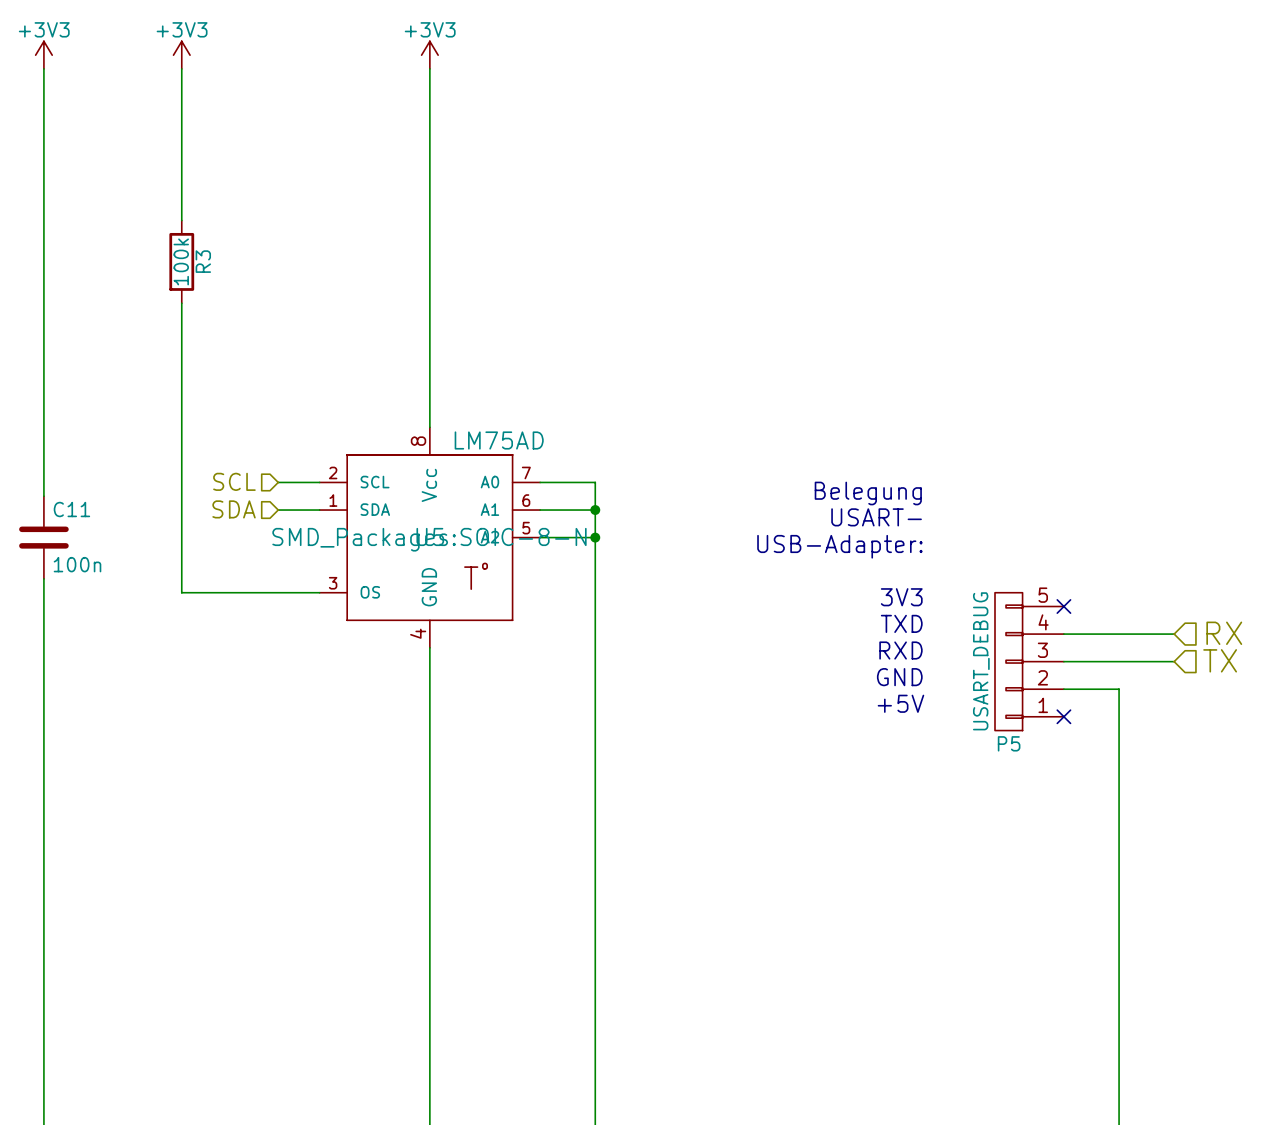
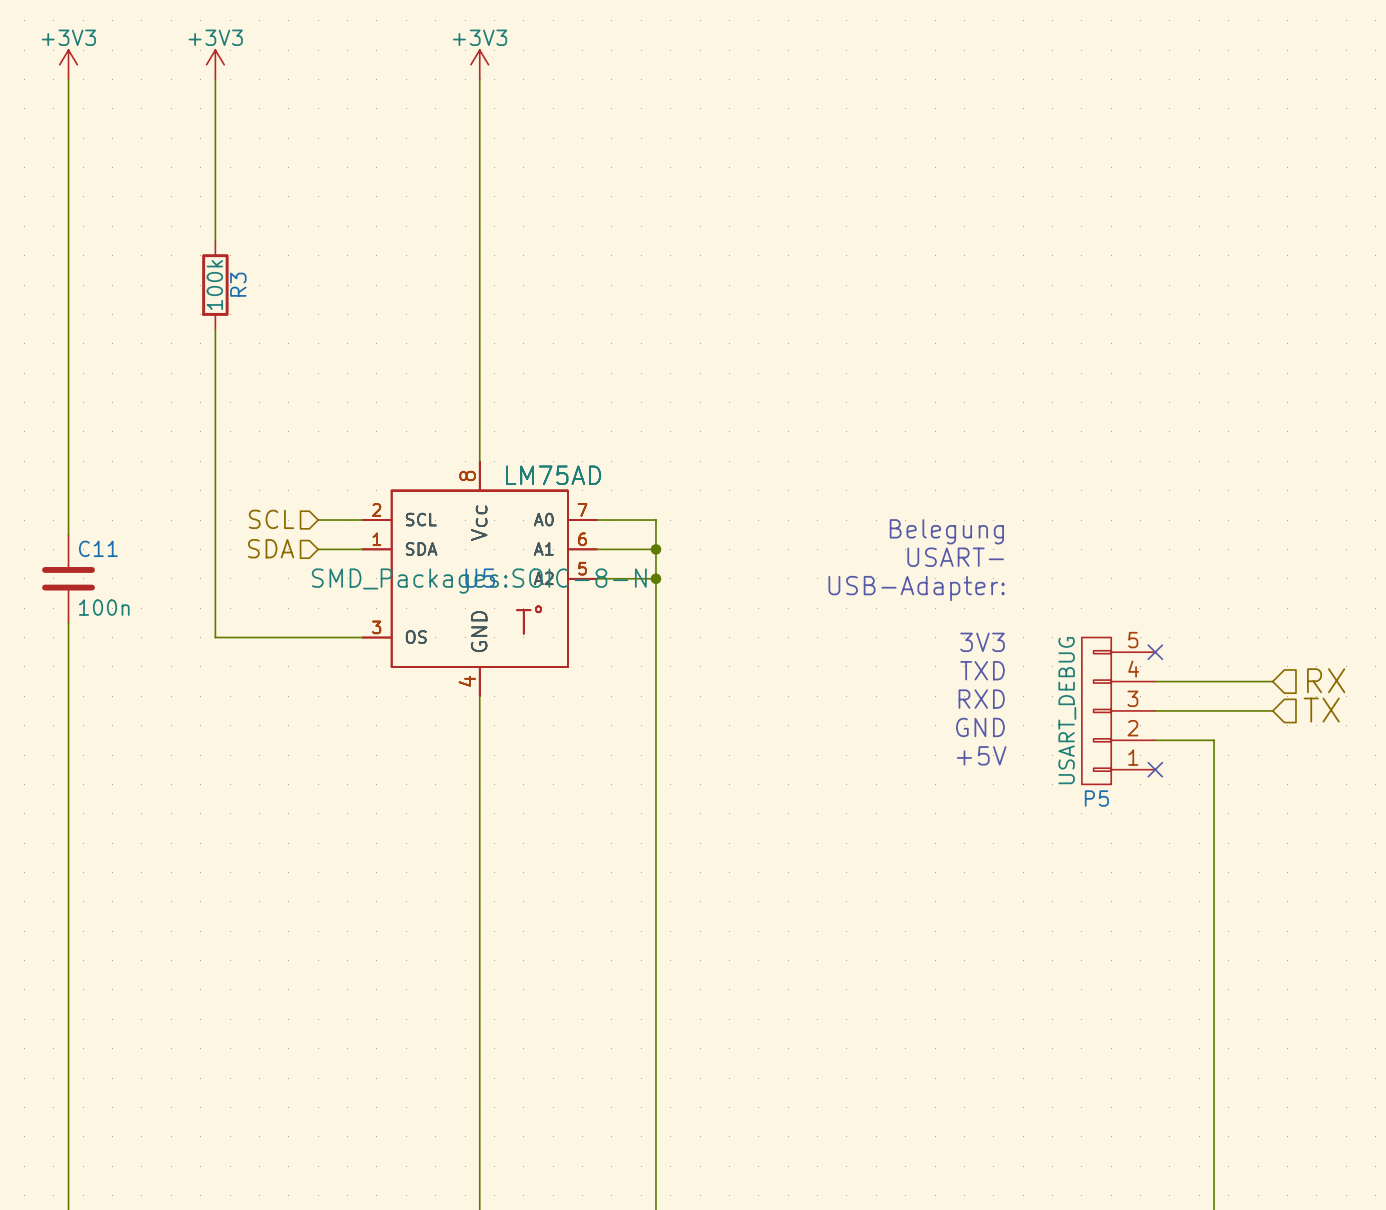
power symbol: none -> LM75AD (479, 578)

